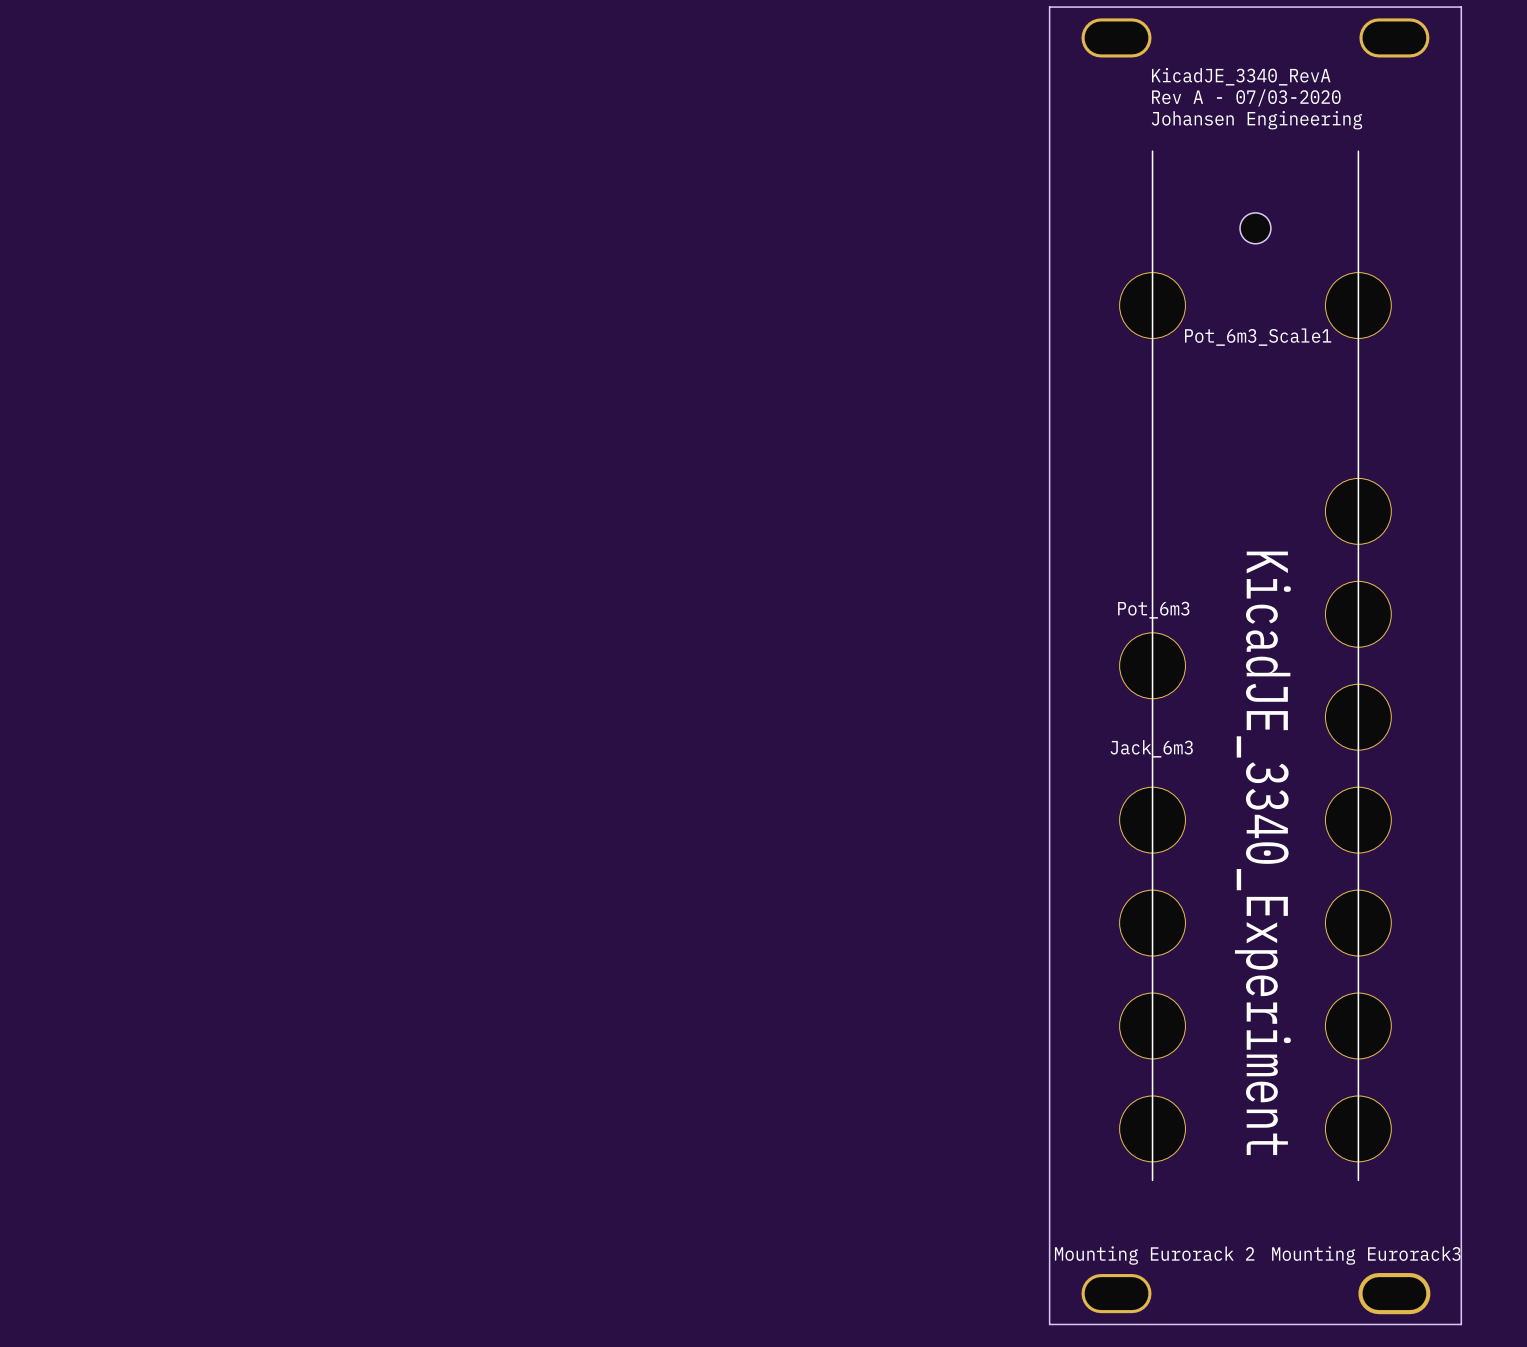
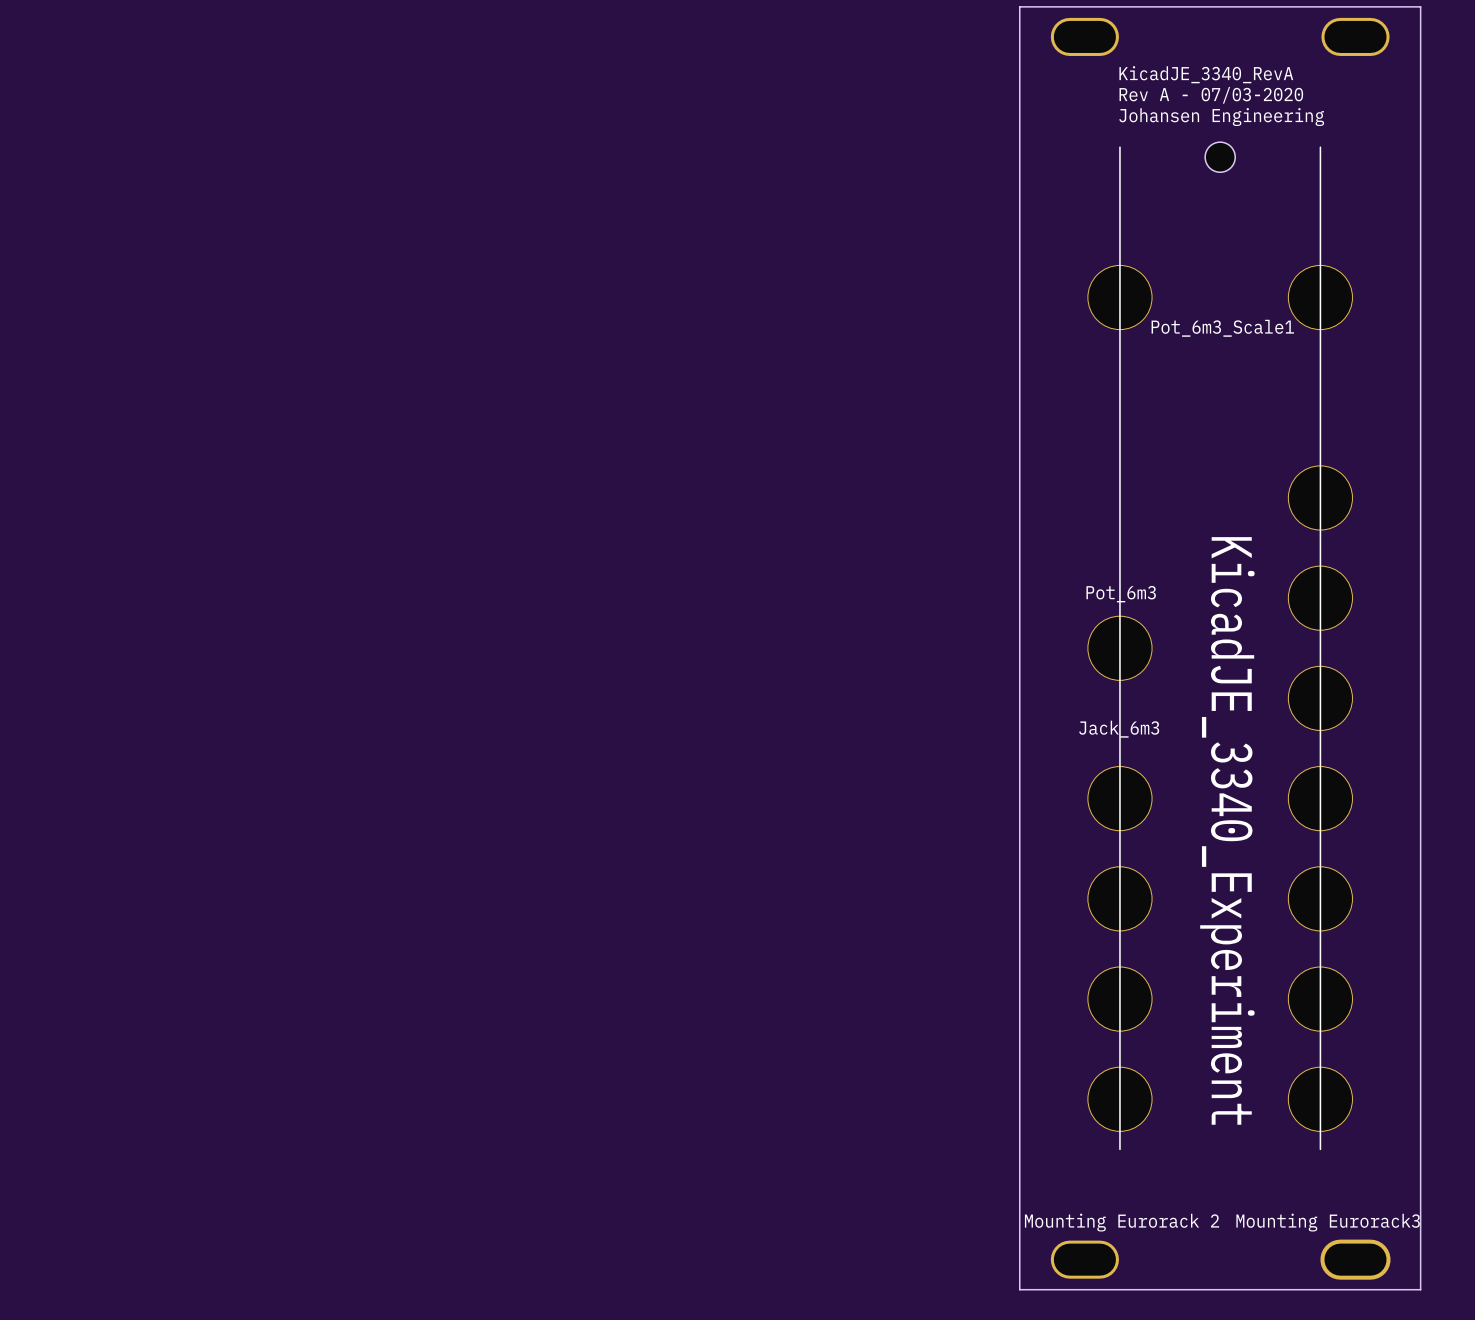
part position: (1255, 228) -> (1220, 157)

